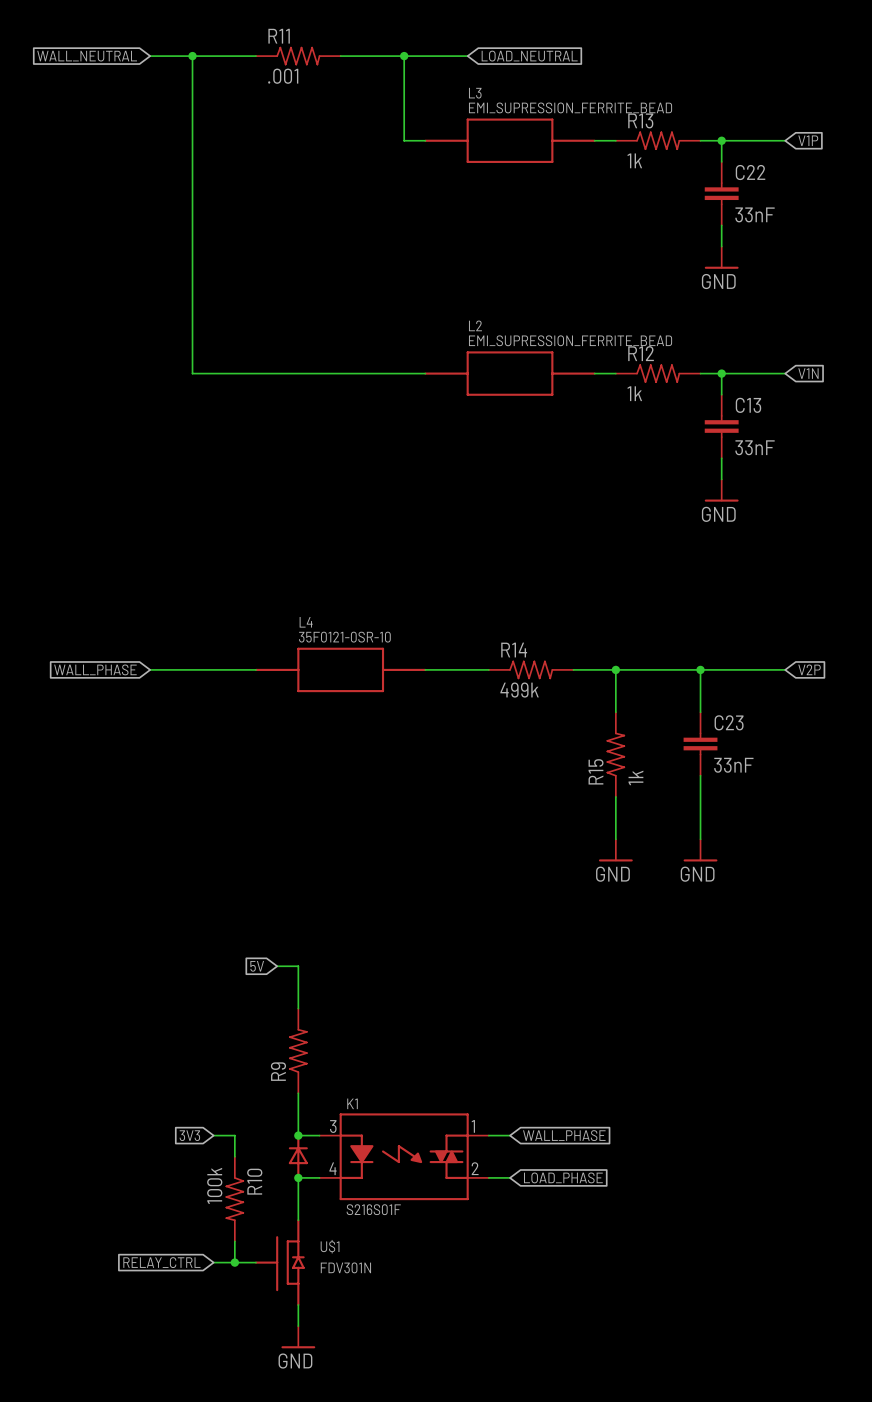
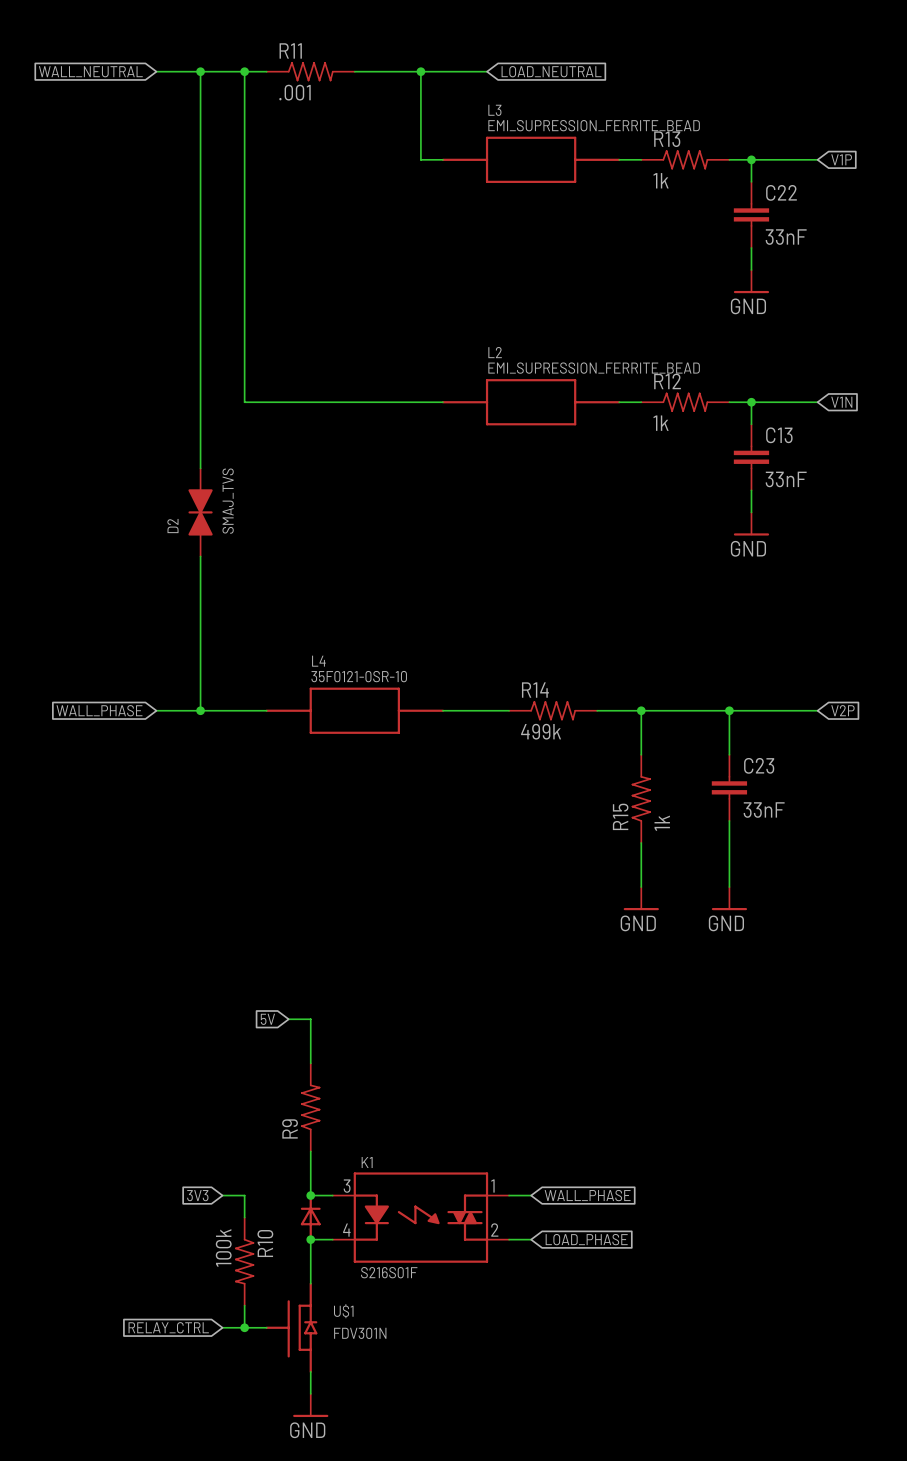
wire: none -> (244, 71) (244, 402)
junction: none -> (244, 71)
wire: (192, 373) (234, 373) -> (200, 402) (200, 468)
D2: none -> SMAJ_TVS (200, 512)
wire: none -> (200, 556) (200, 710)
junction: none -> (200, 710)

